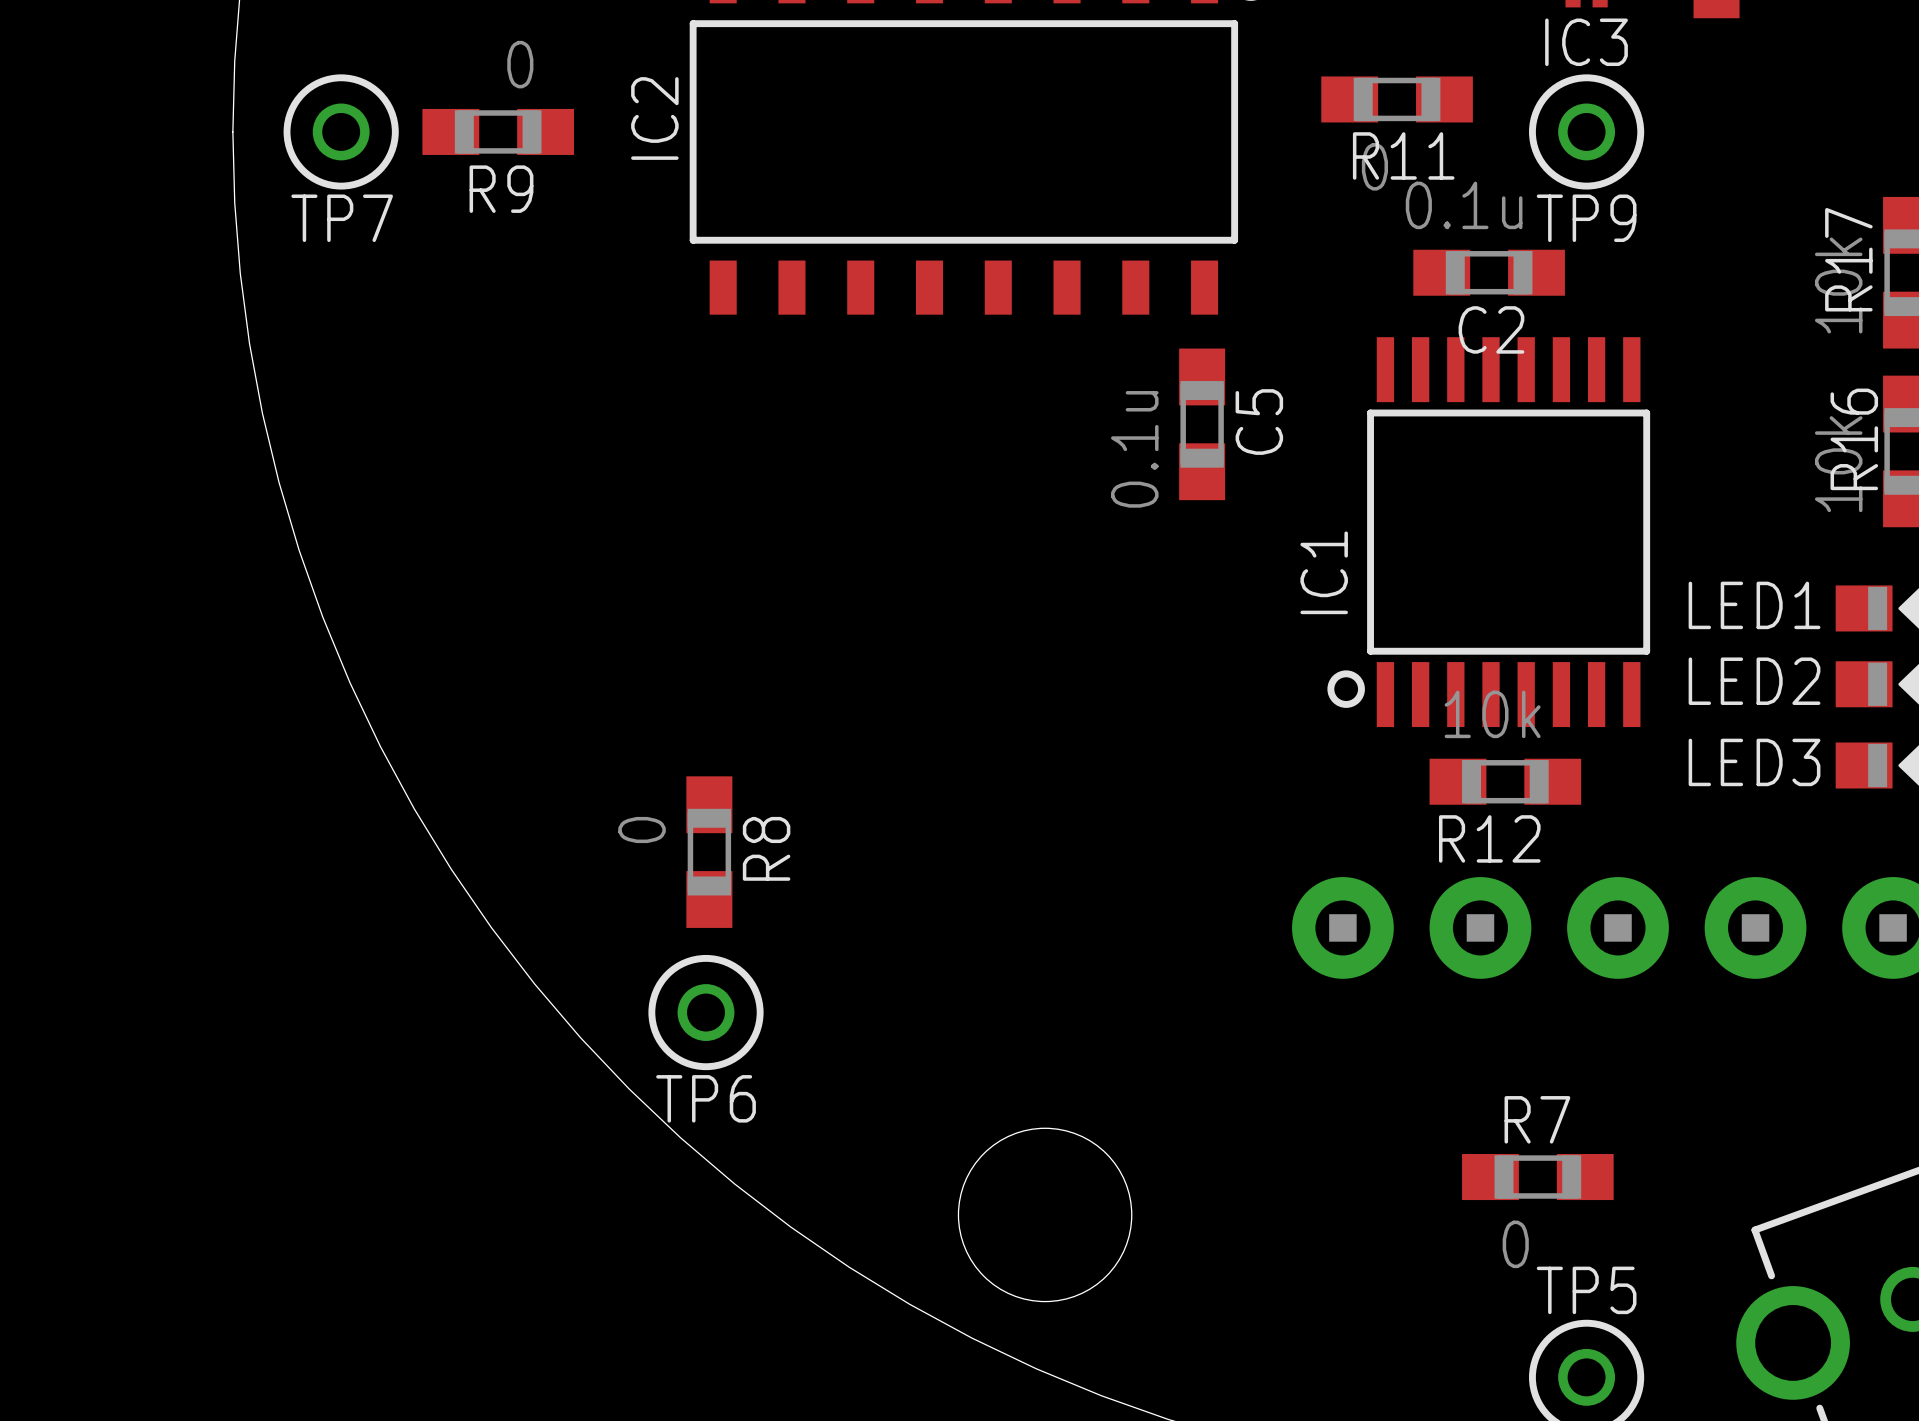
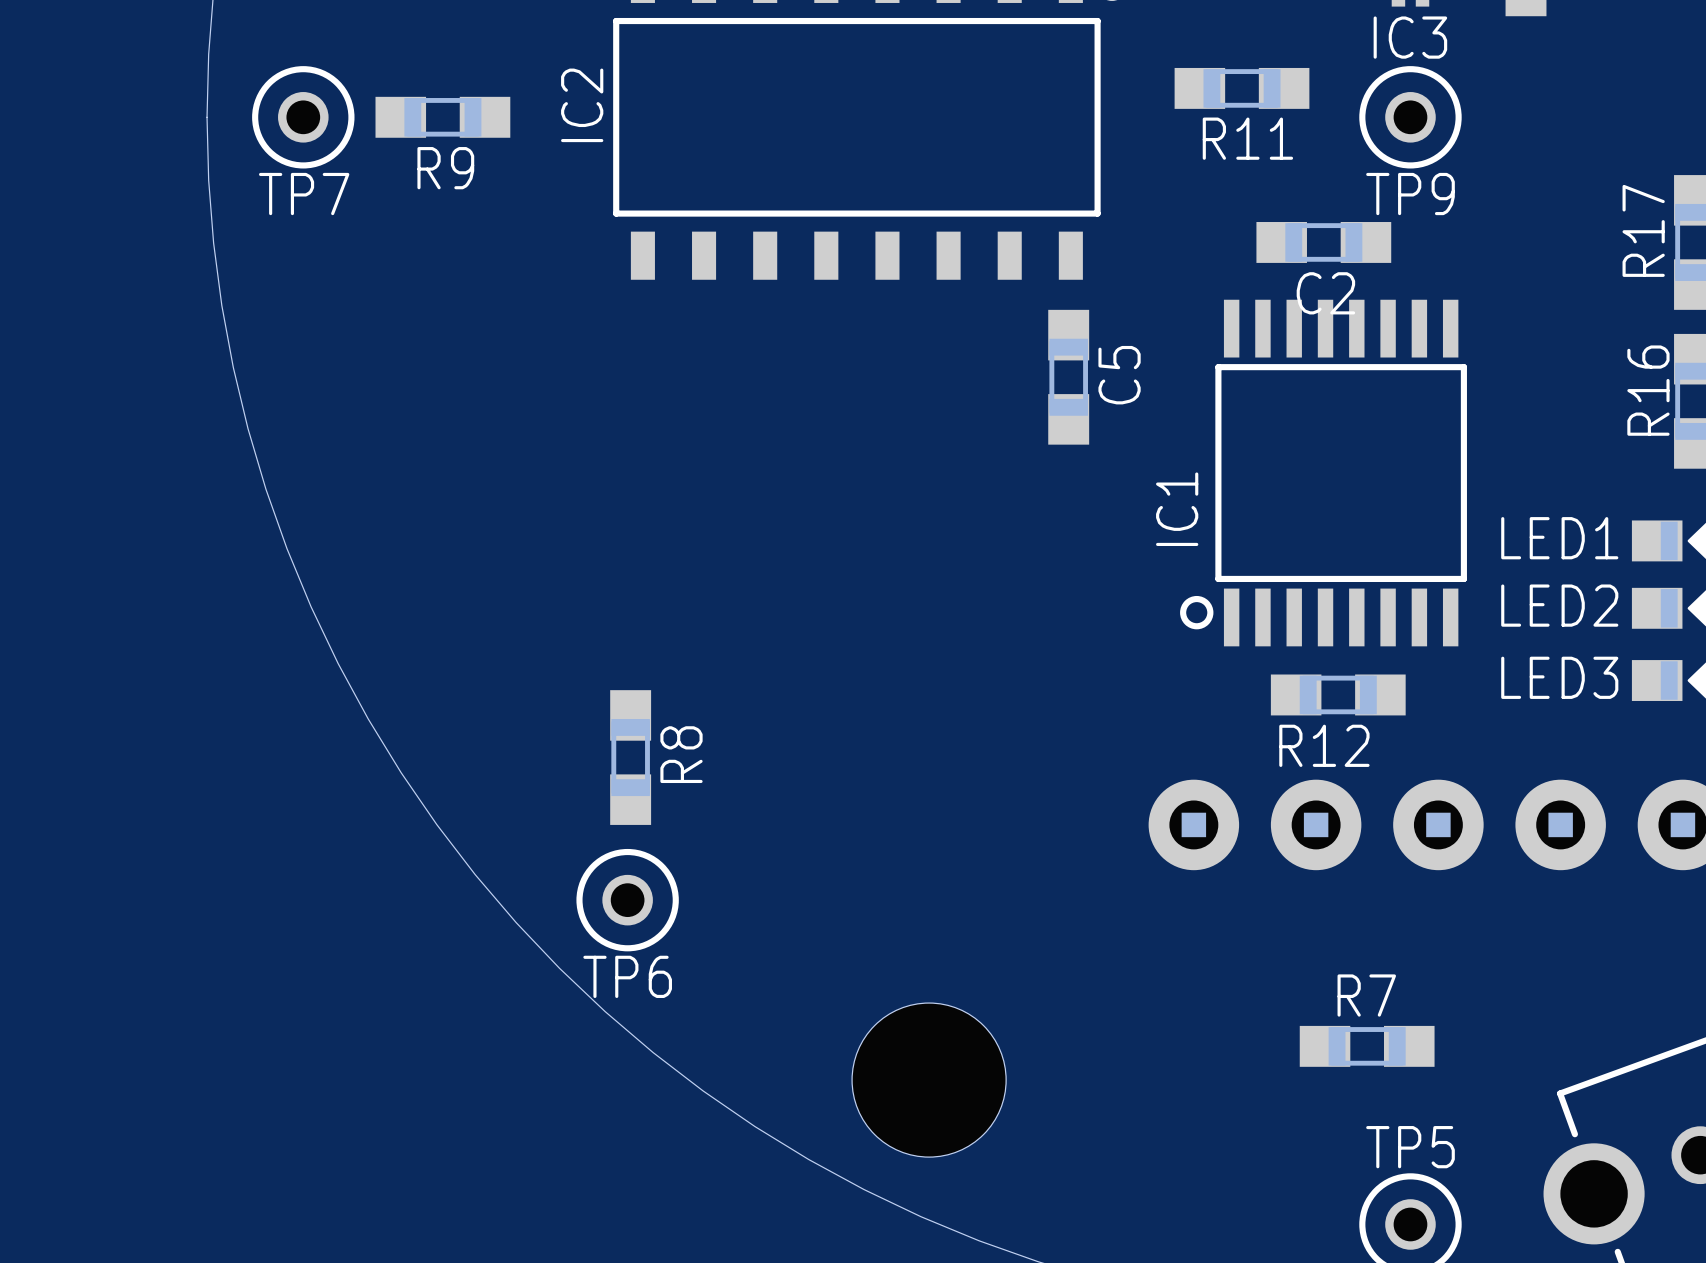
R9 value: 0 (520, 64) -> none
R11 value: 0 (1374, 166) -> none
C2 value: 0.1u (1464, 205) -> none
R17 value: 10k (1838, 285) -> none
C5 value: 0.1u (1134, 449) -> none
R16 value: 10k (1838, 464) -> none
R12 value: 10k (1492, 714) -> none
R8 value: 0 (642, 829) -> none
R7 value: 0 (1515, 1244) -> none

